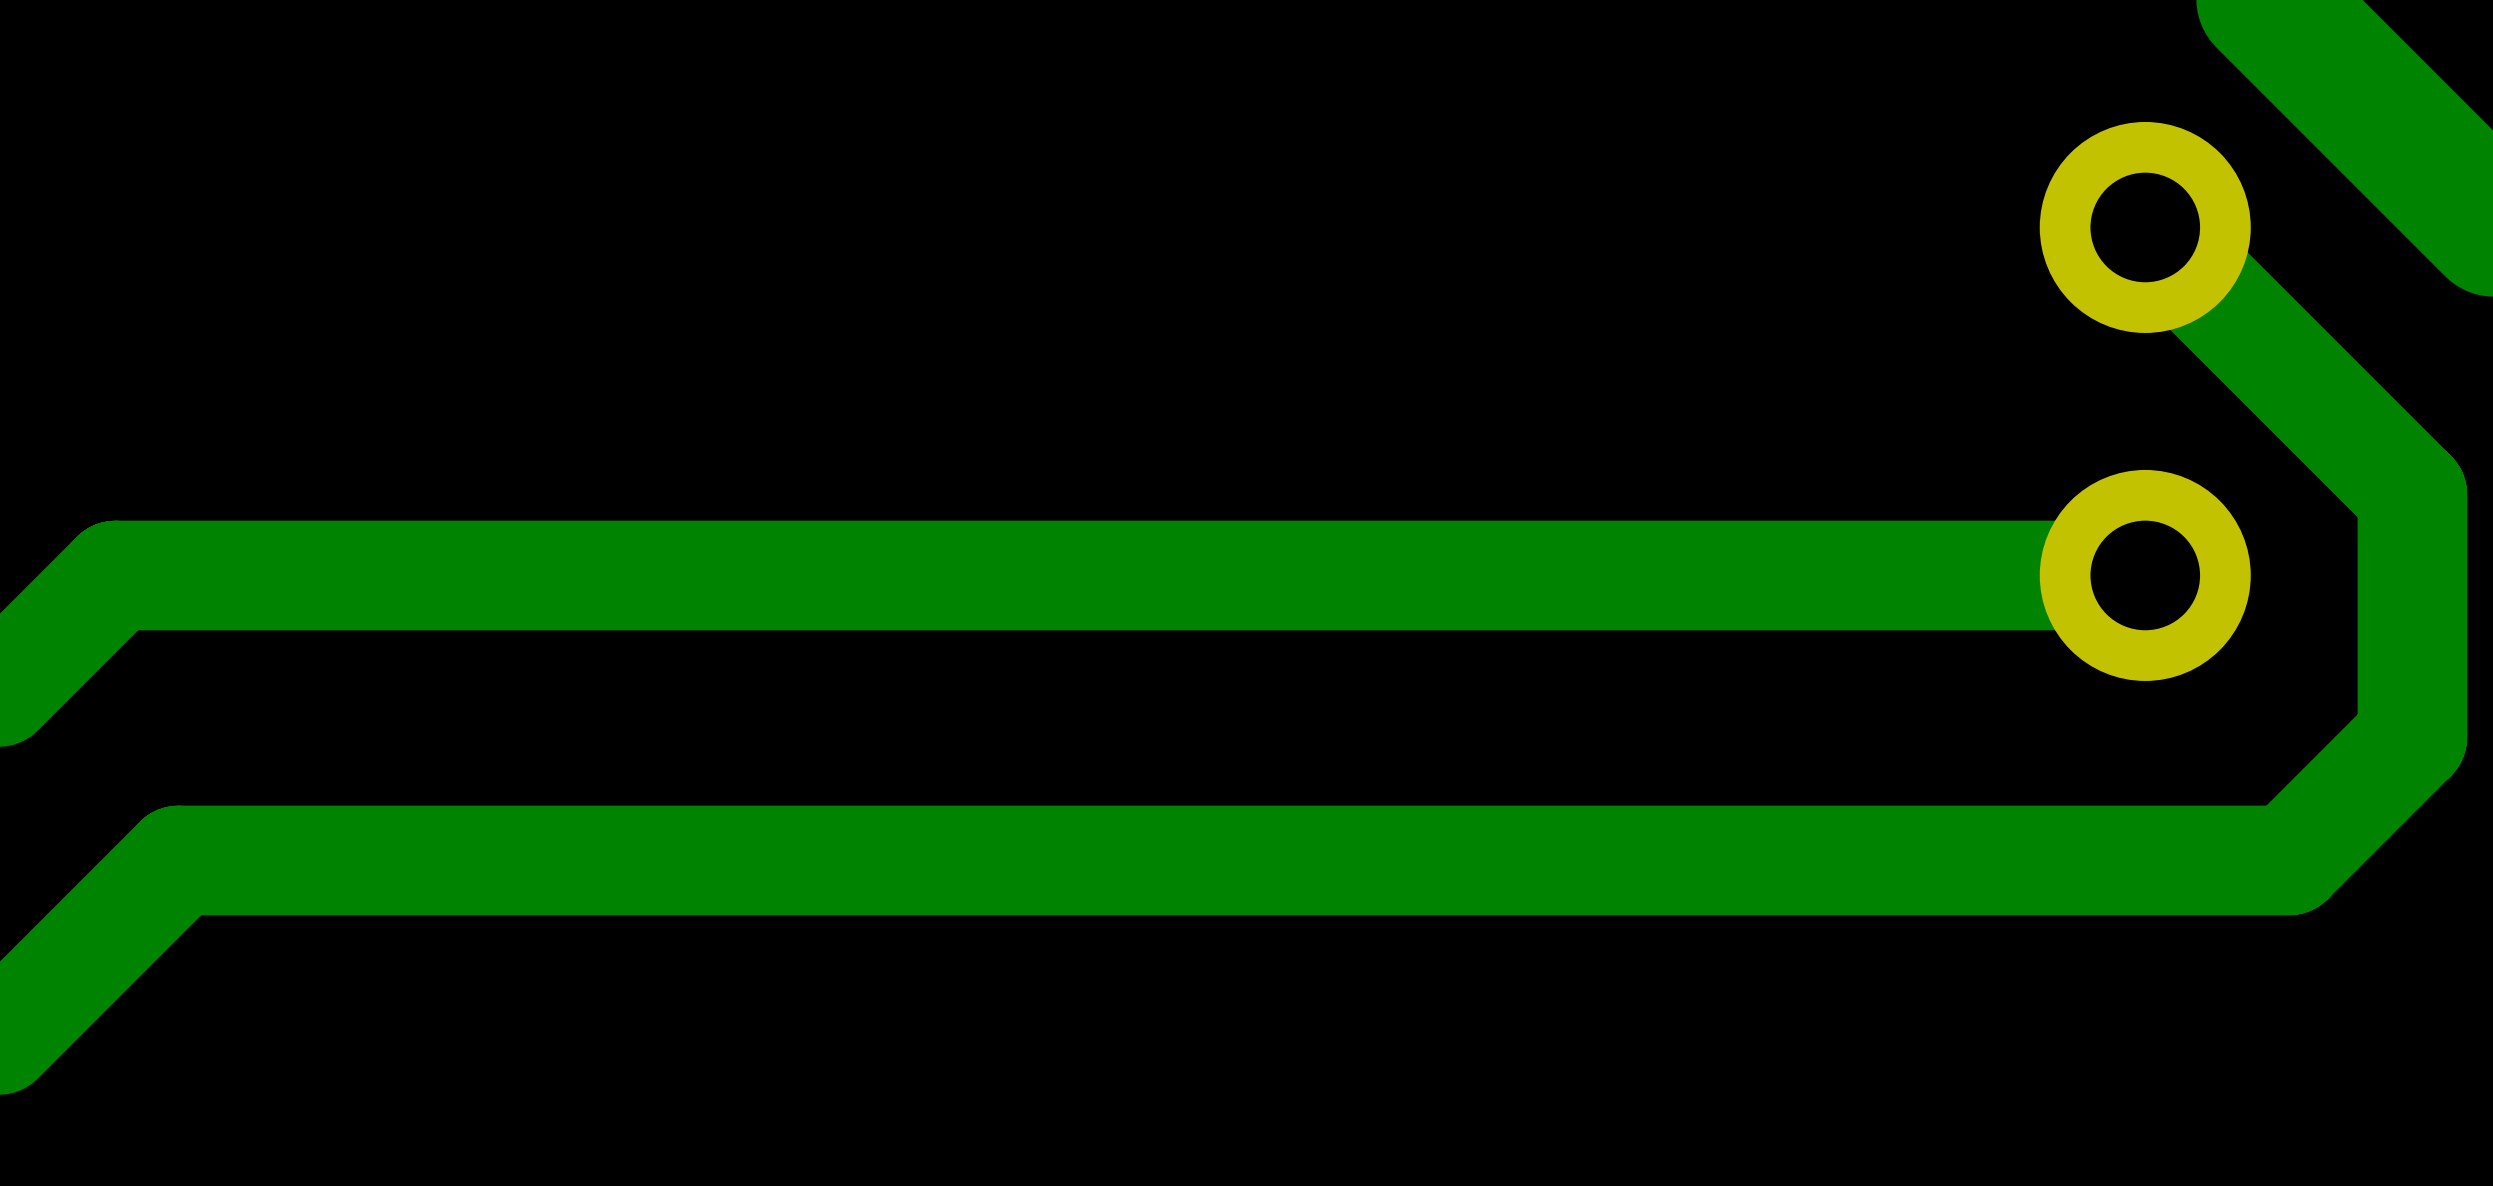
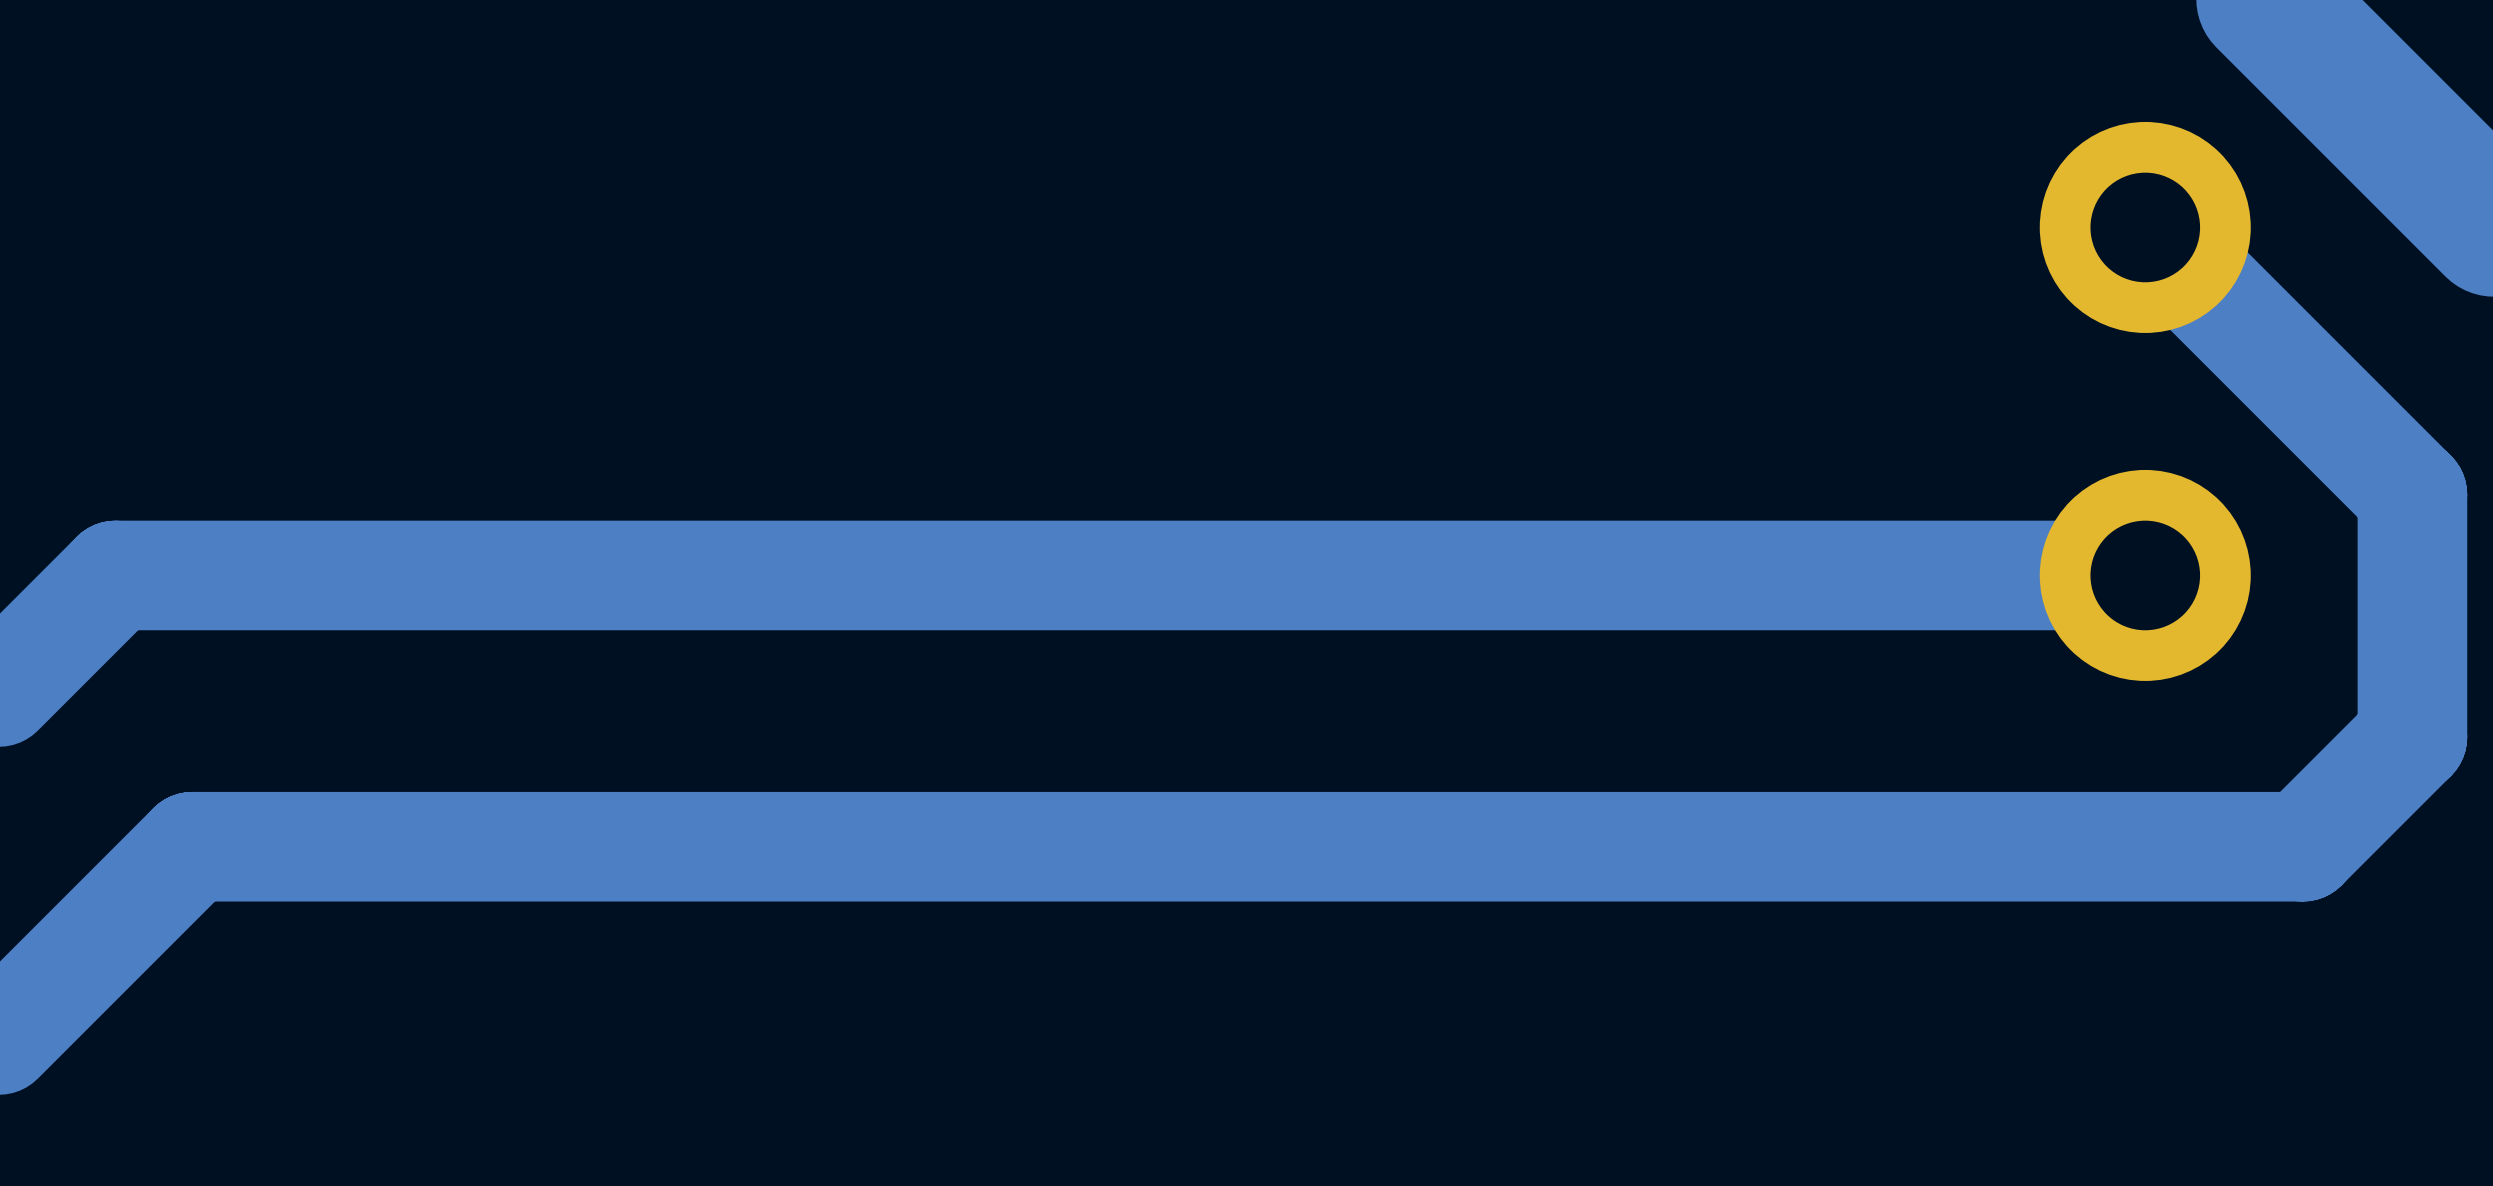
bottom track: (2302, 846) (2289, 860) (178, 860) -> (2302, 846) (192, 846) (178, 860)

